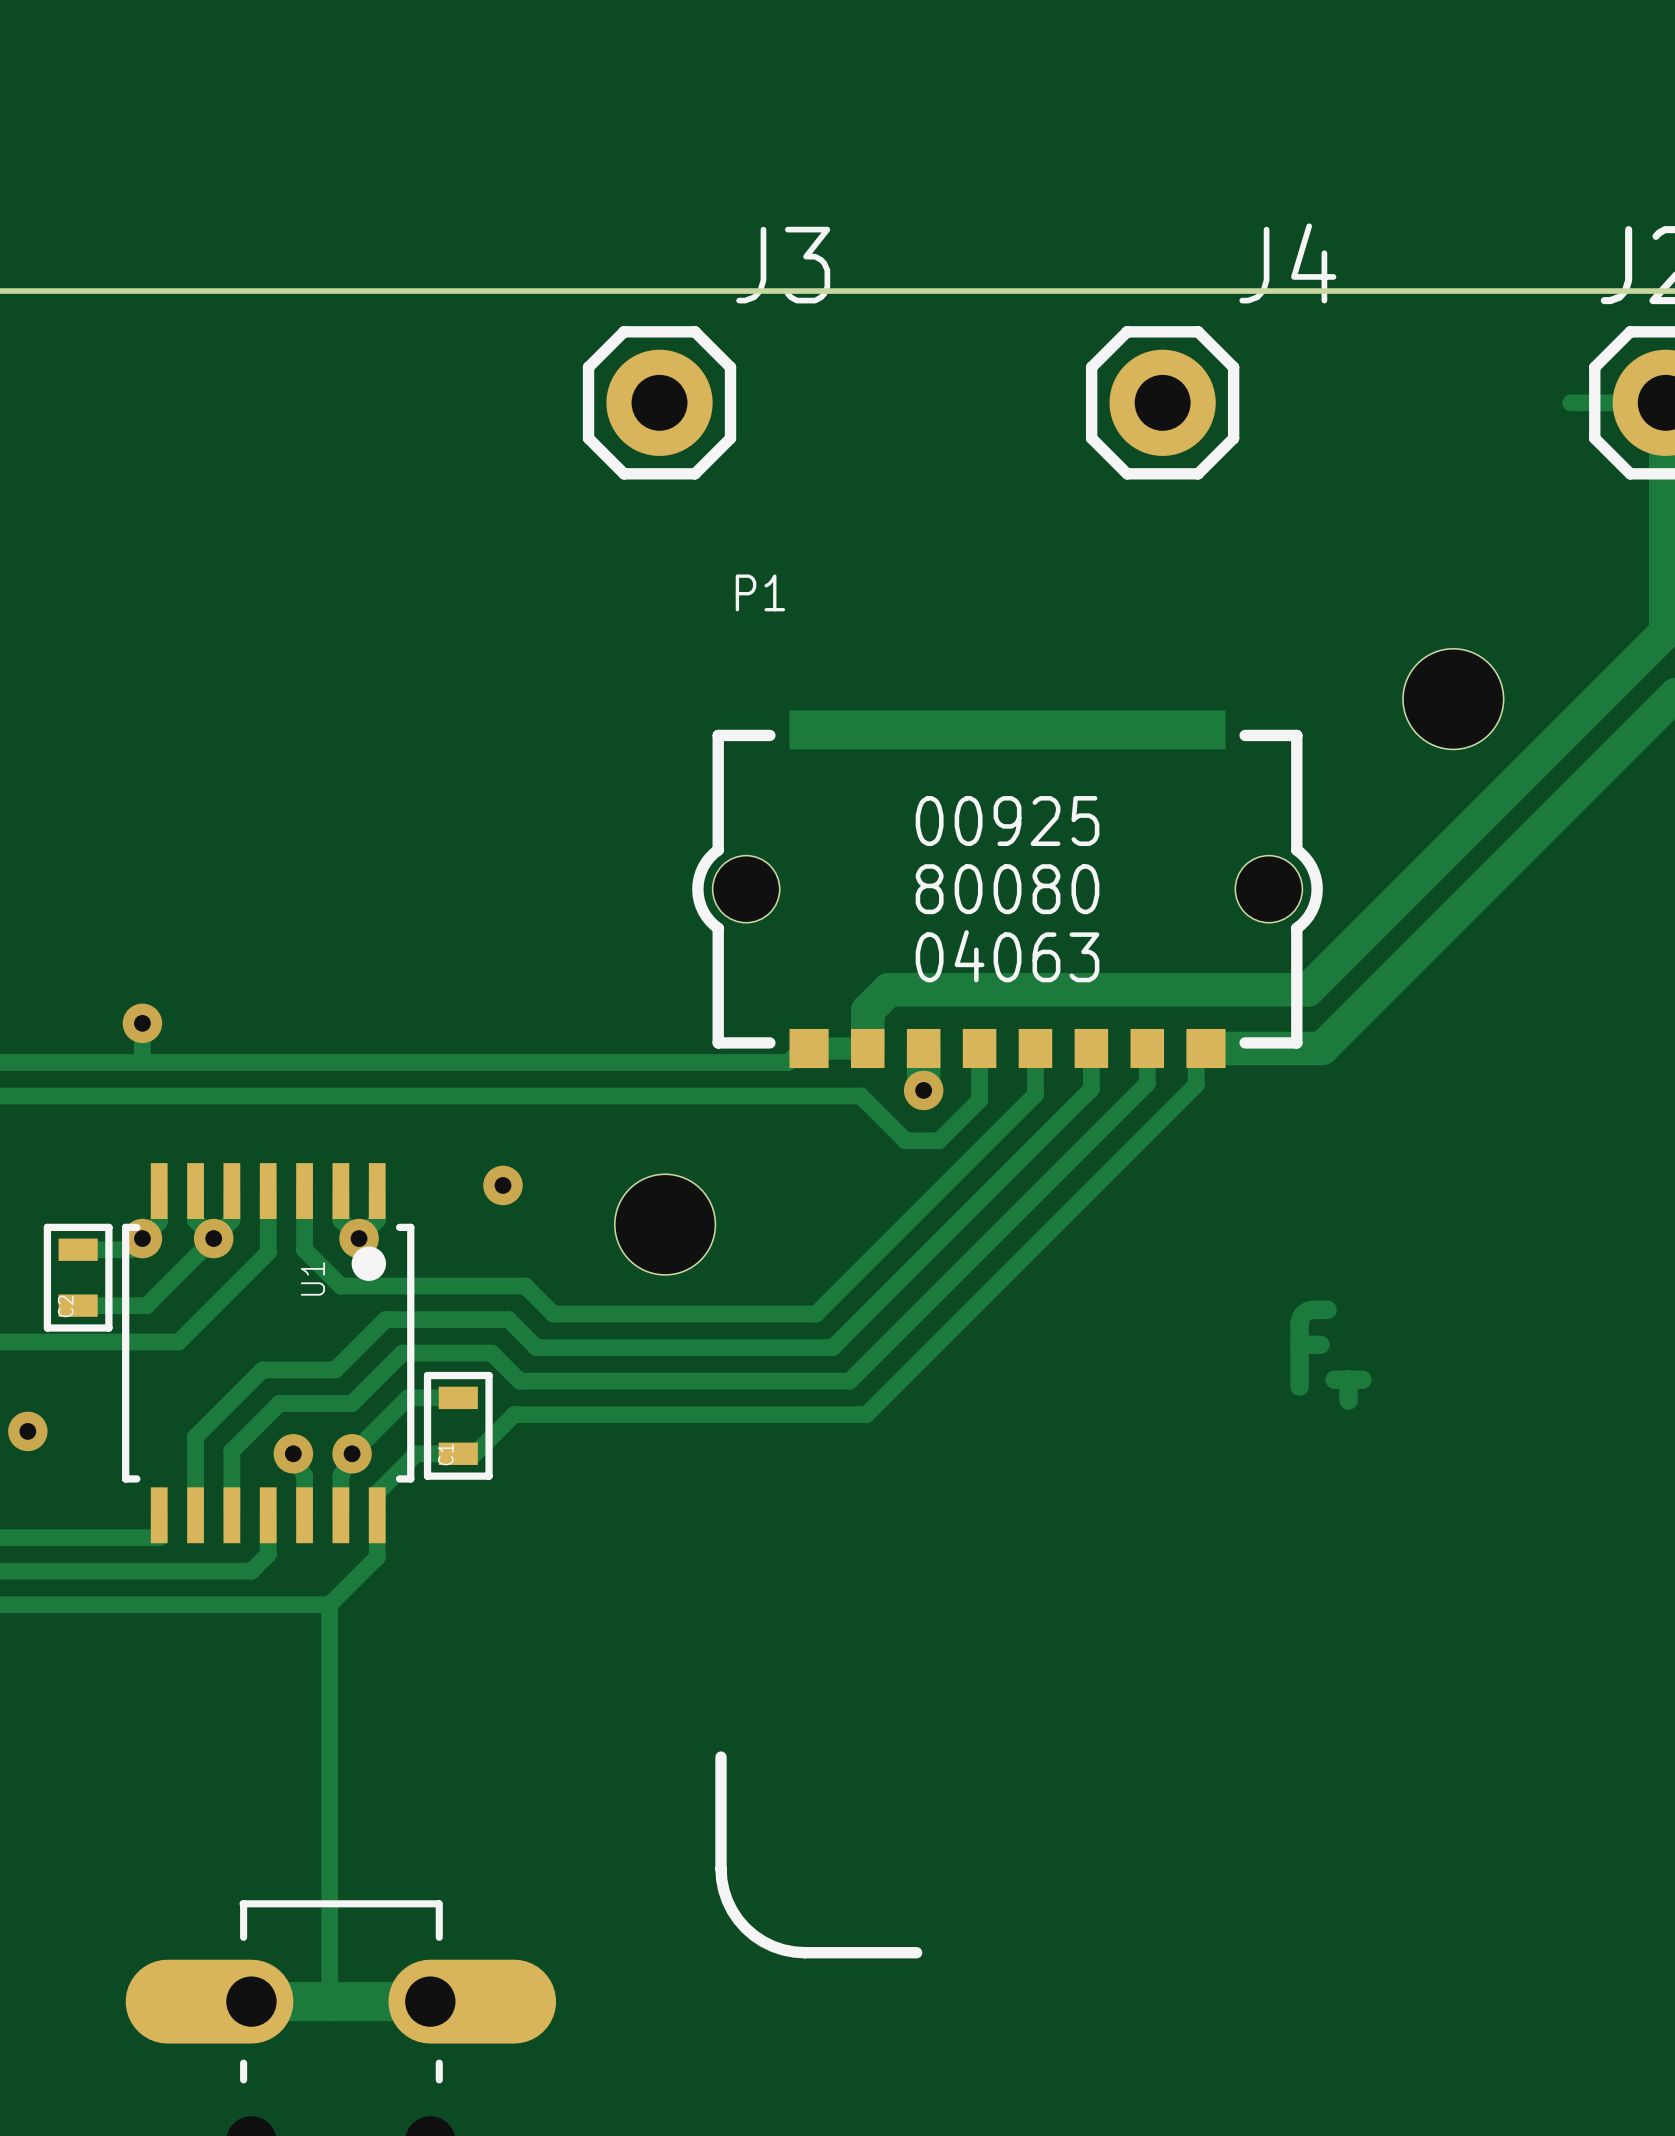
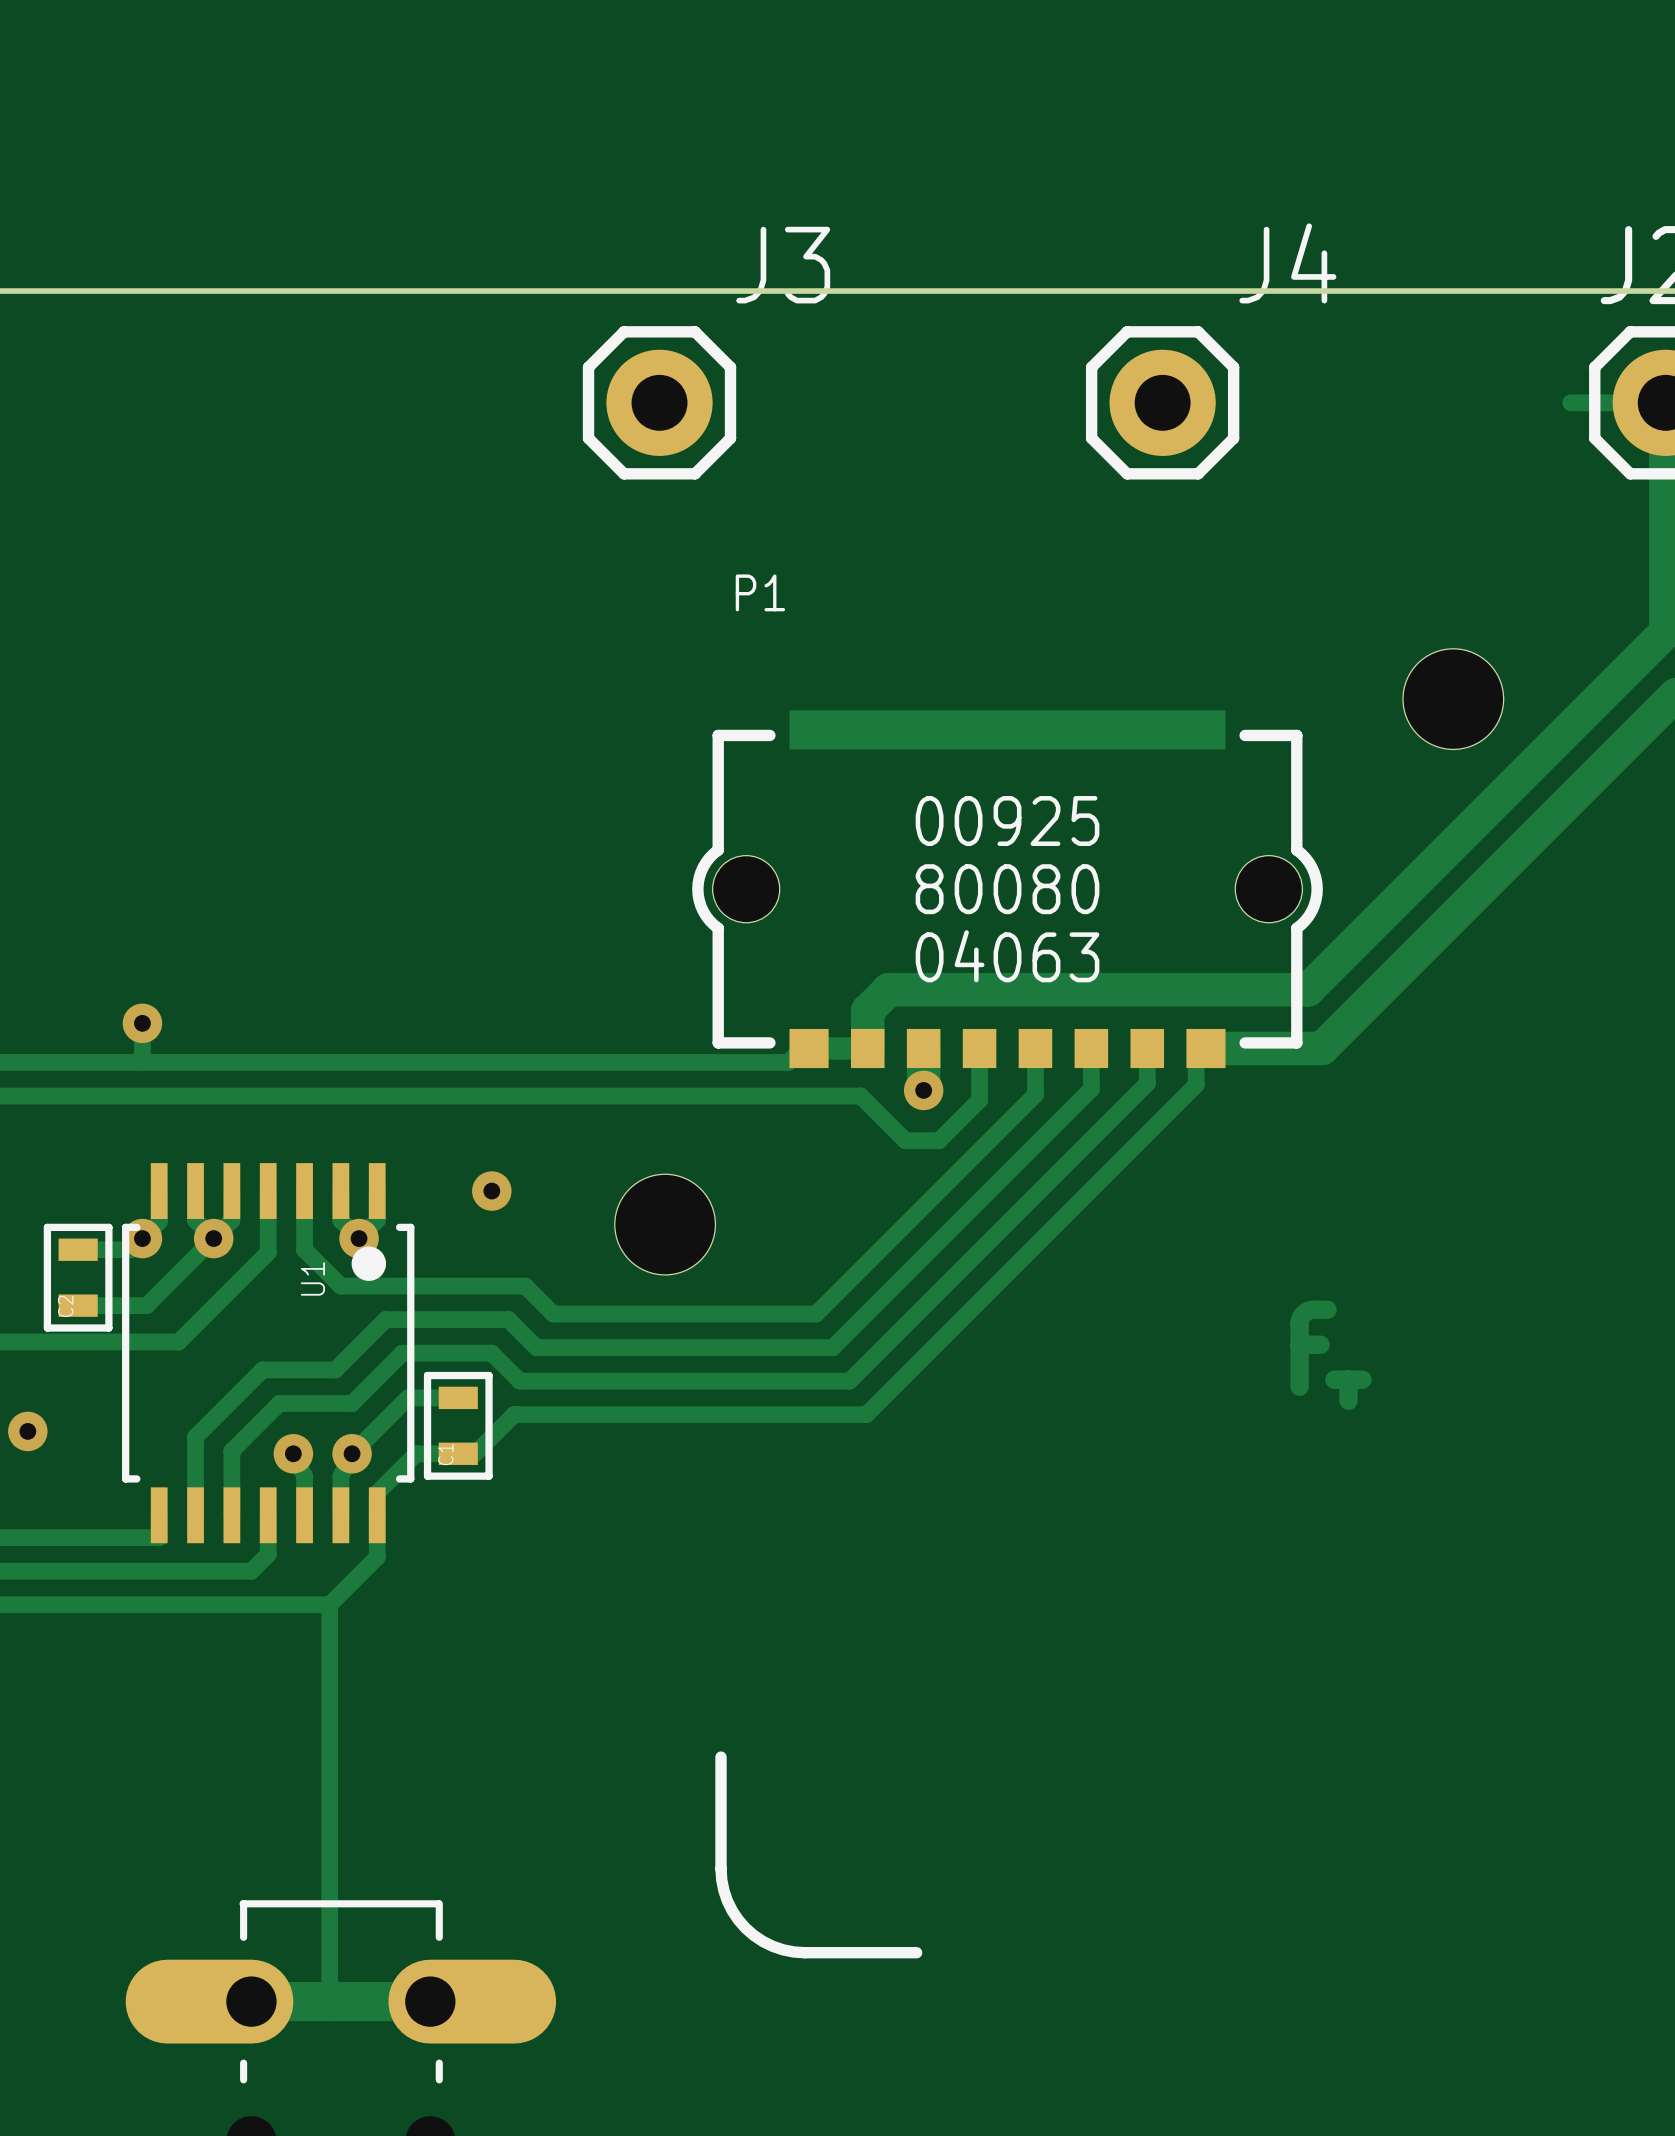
via position: (503, 1185) -> (491, 1191)

